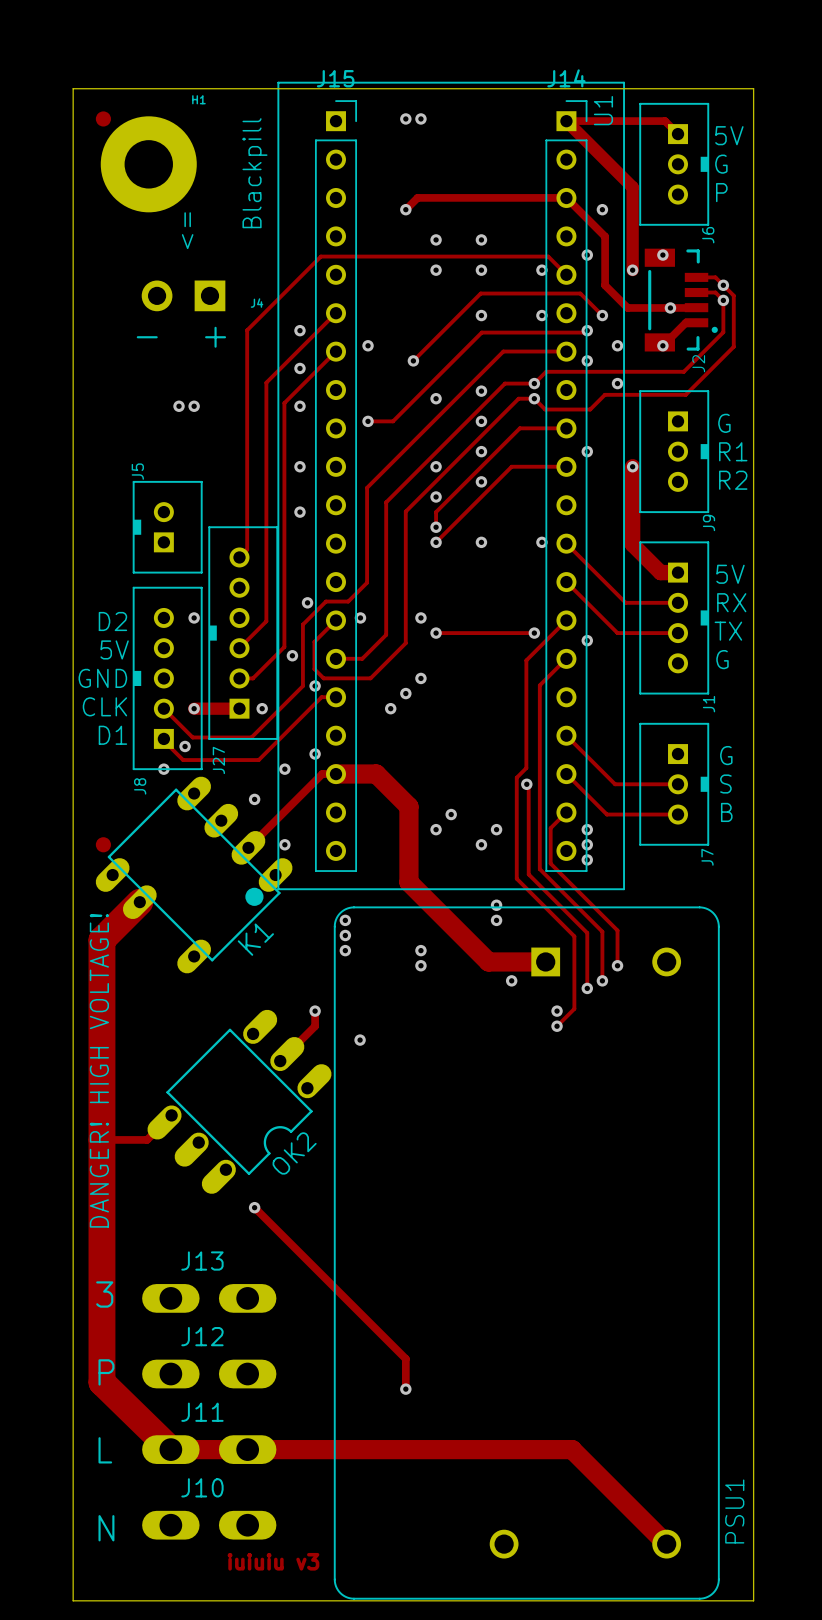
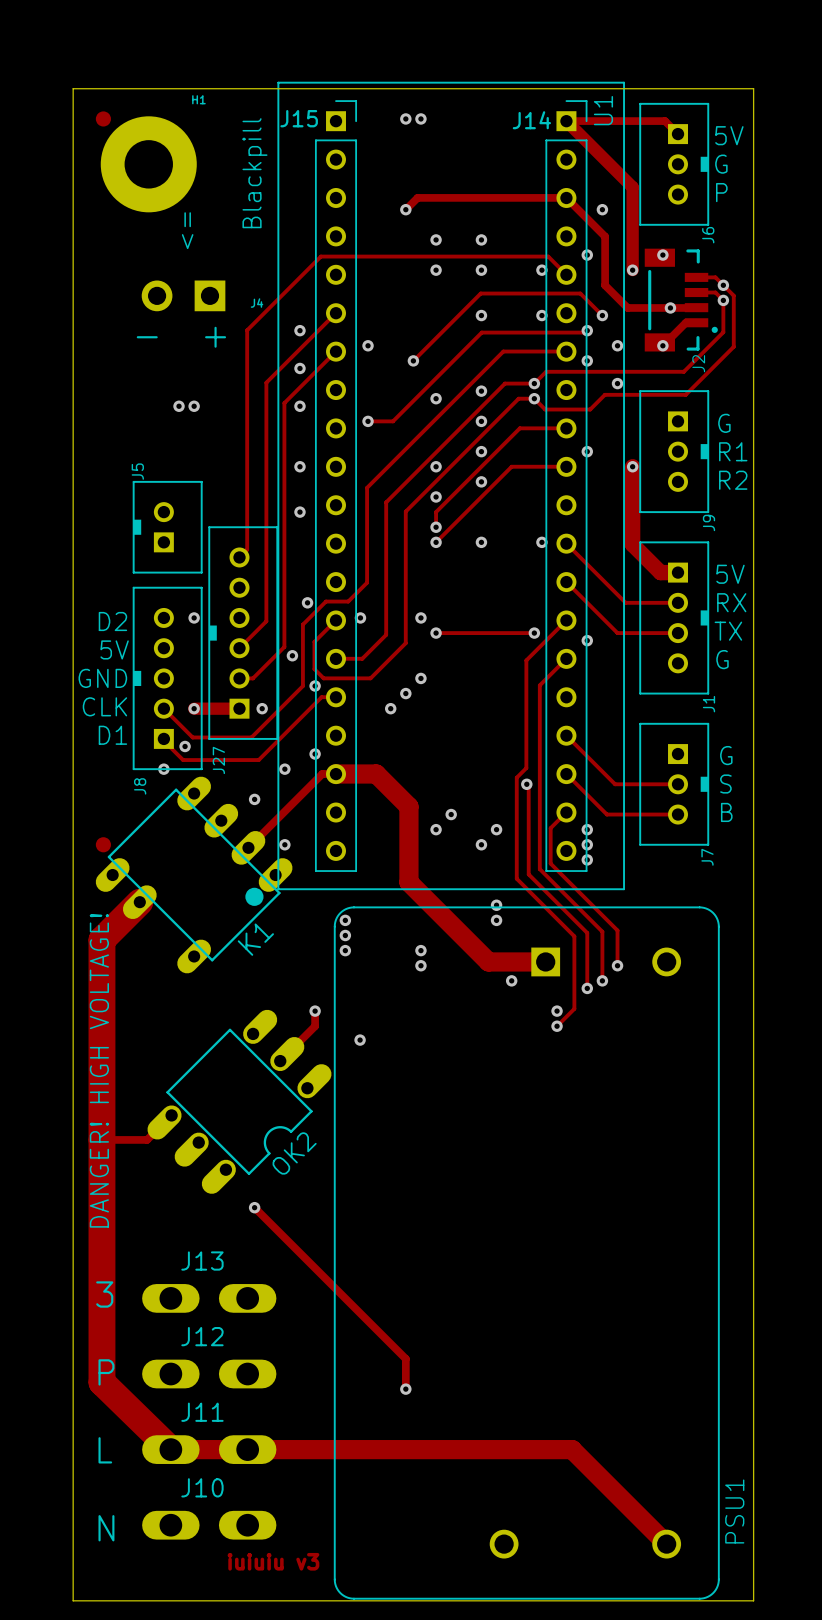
J15 name position: J15 (335, 78) -> J15 (299, 118)
J14 name position: J14 (566, 78) -> J14 (531, 120)

